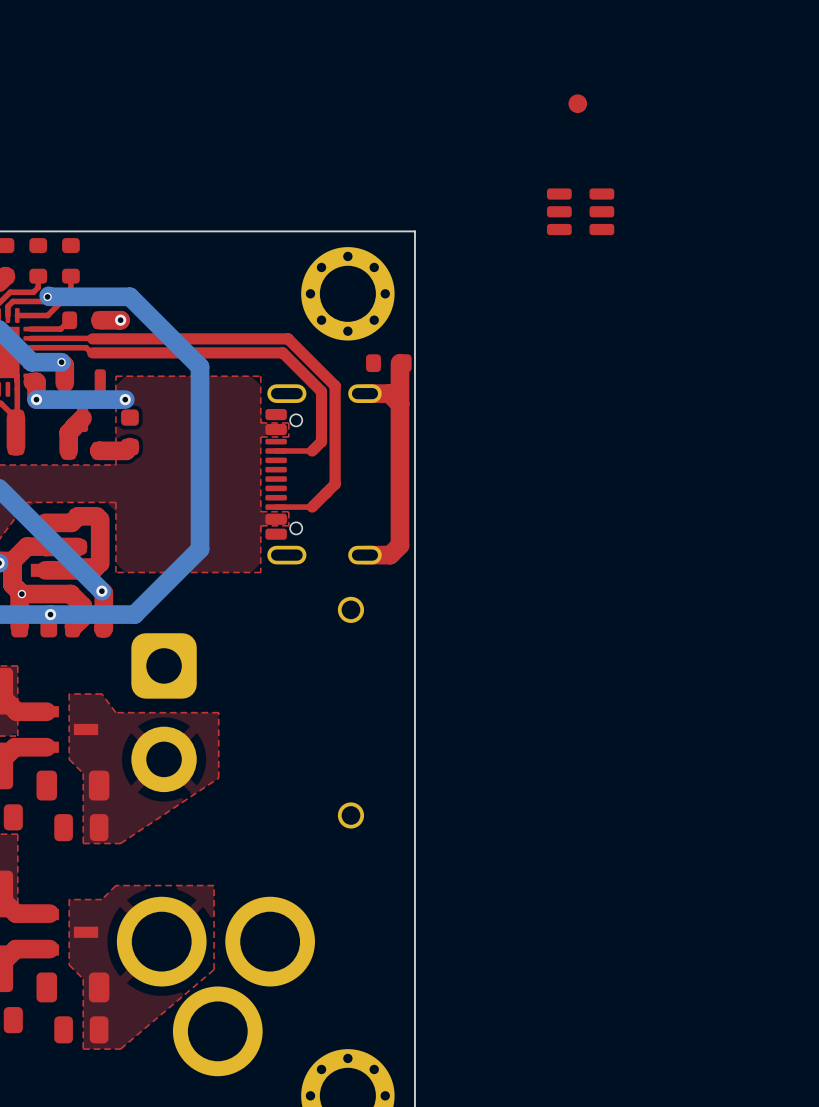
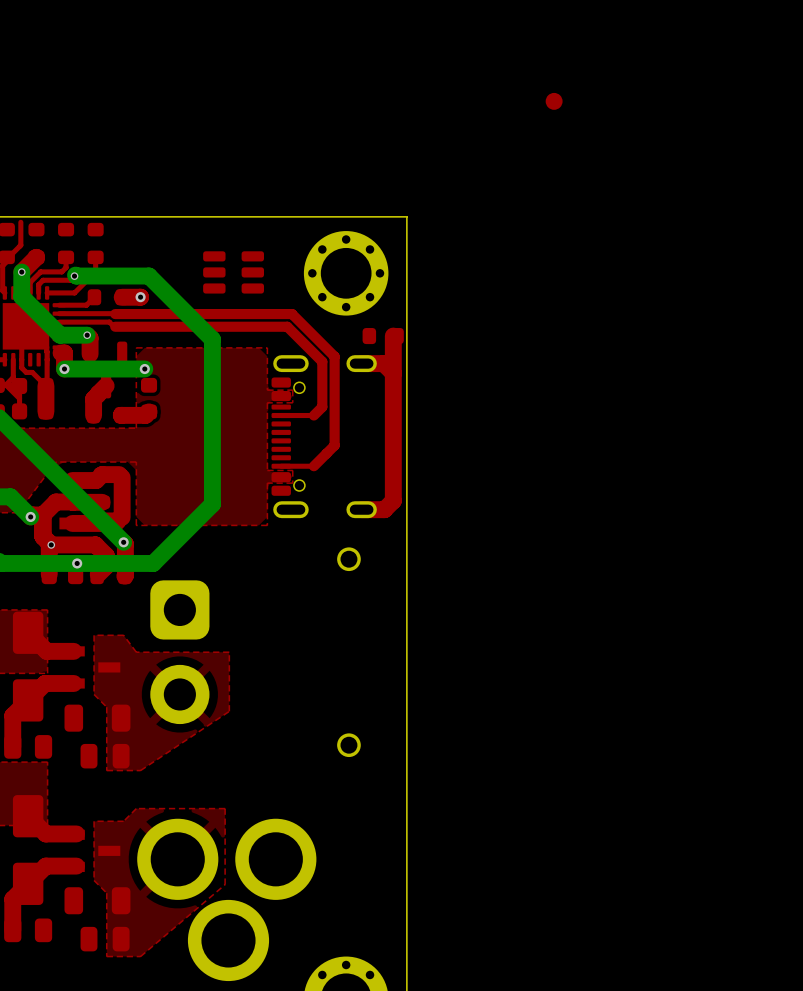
part position: (580, 211) -> (233, 272)

